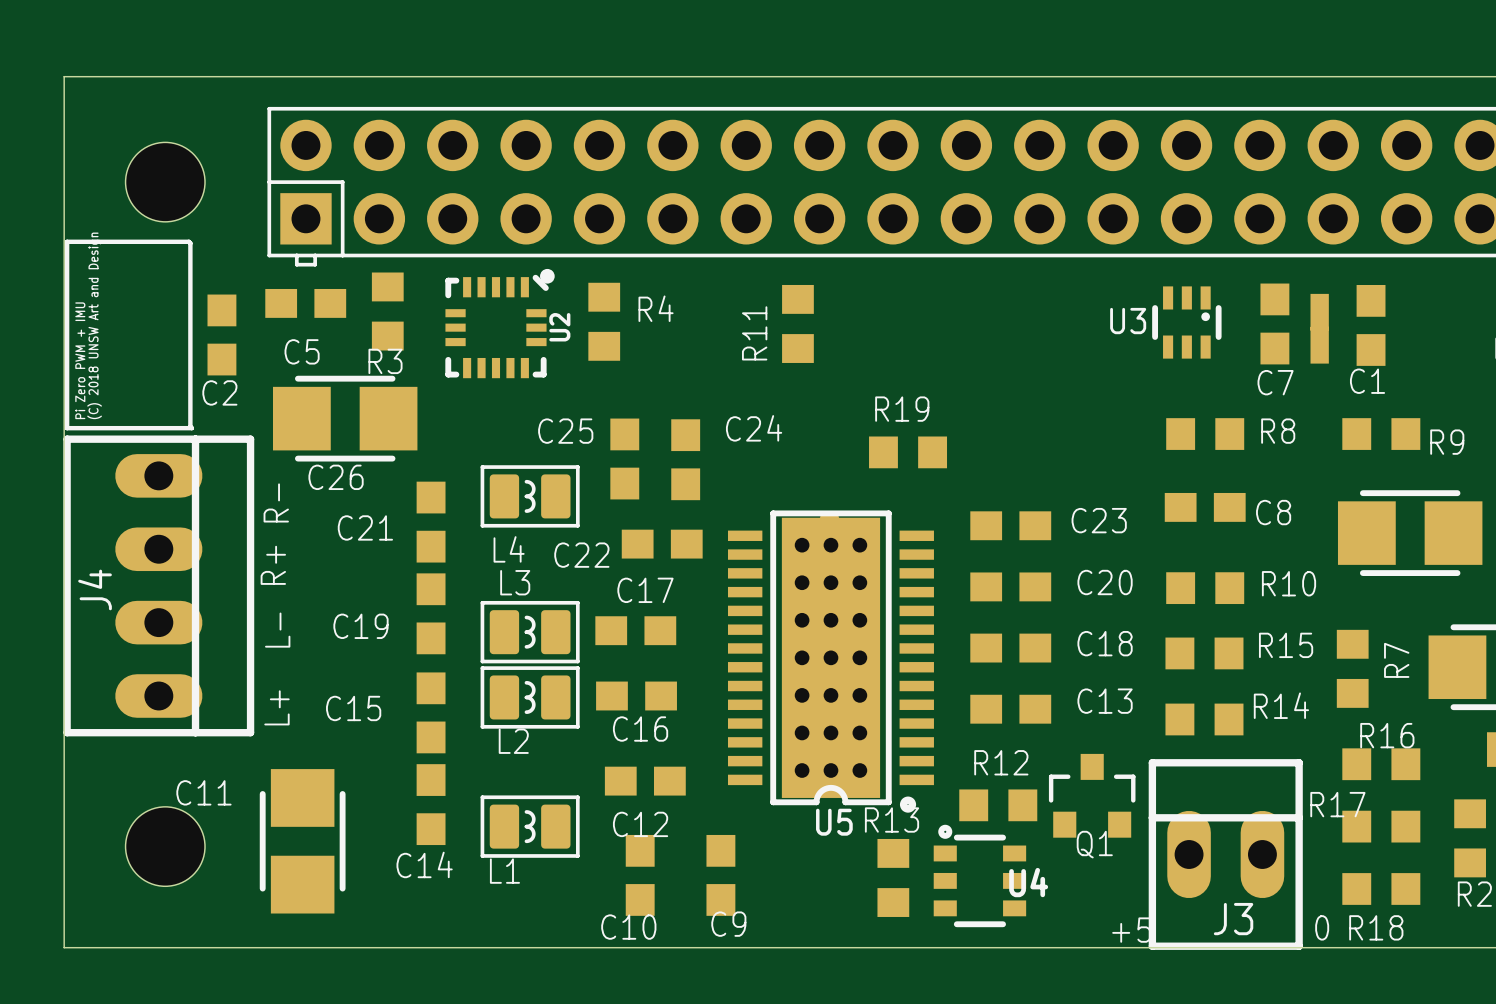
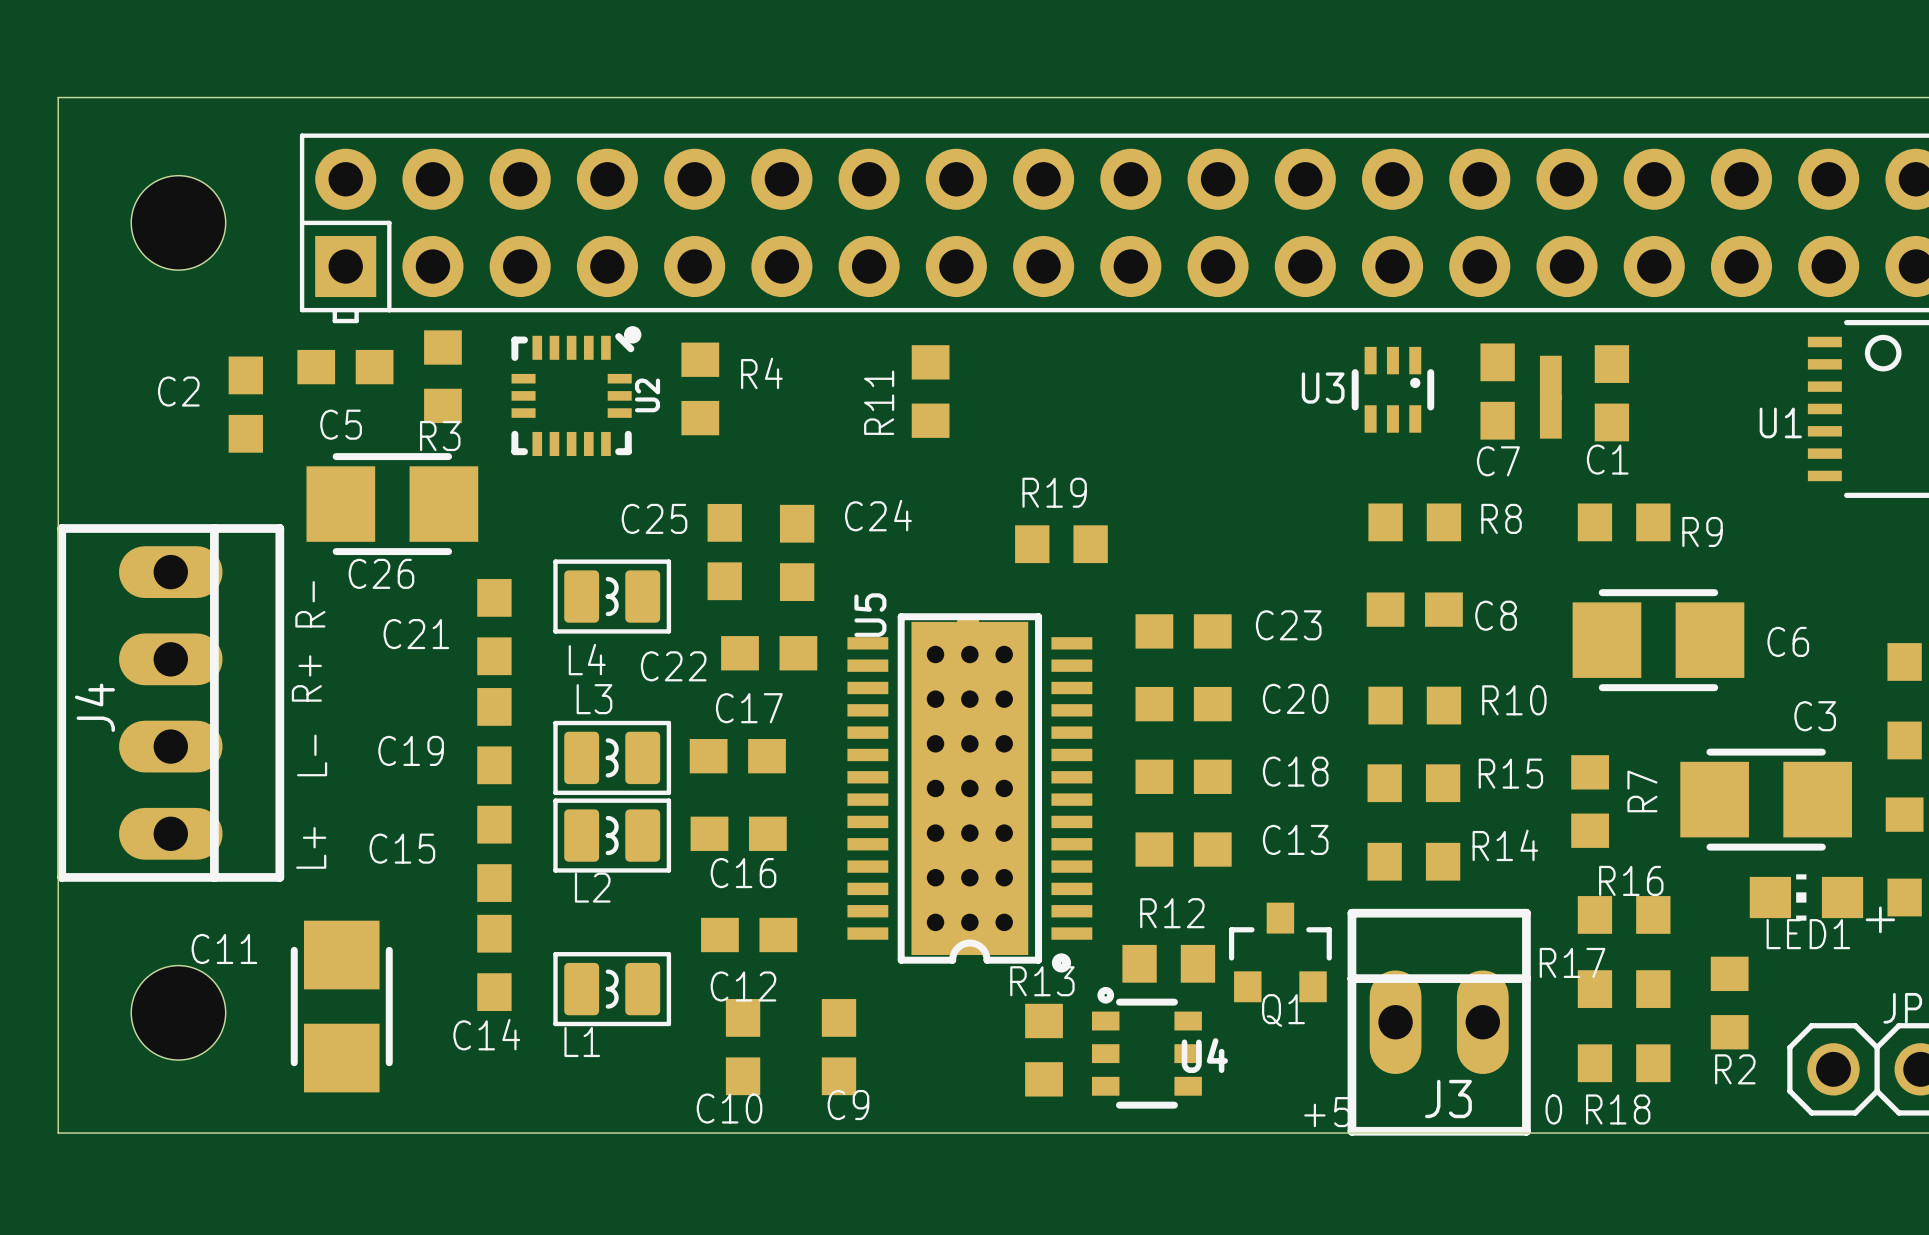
line: (67, 241) (190, 243) (191, 428) (67, 428) (67, 241) -> none
text: (C) 2018 UNSW Art and Design (94, 325) -> none
text: Pi Zero PWM + IMU (80, 360) -> none
C2 name position: C2 (219, 392) -> C2 (178, 391)
U5 name rotation: 0° (834, 822) -> 90° counterclockwise (870, 615)
U5 name position: U5 (834, 822) -> U5 (870, 615)

